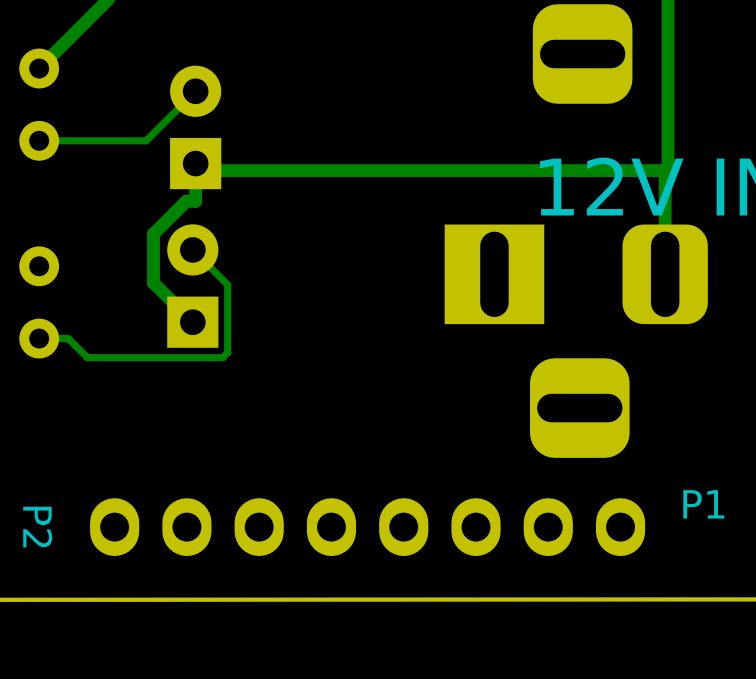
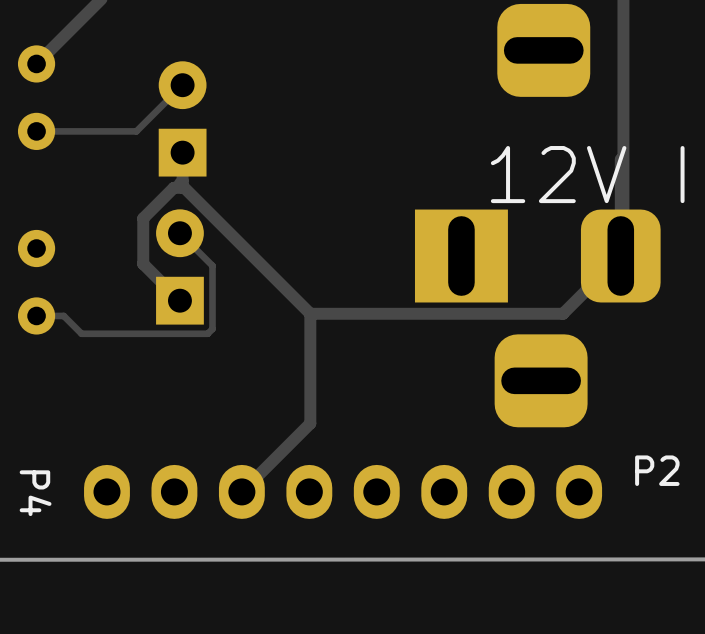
track: (668, 167) (665, 170) (195, 170) -> (623, 156) (623, 253) (563, 313) (310, 313)
track: none -> (179, 183) (310, 313)
track: none -> (310, 313) (310, 423) (241, 491)
P1 name: P1 (703, 504) -> P2 (657, 470)
P2 name: P2 (37, 527) -> P4 (35, 493)

